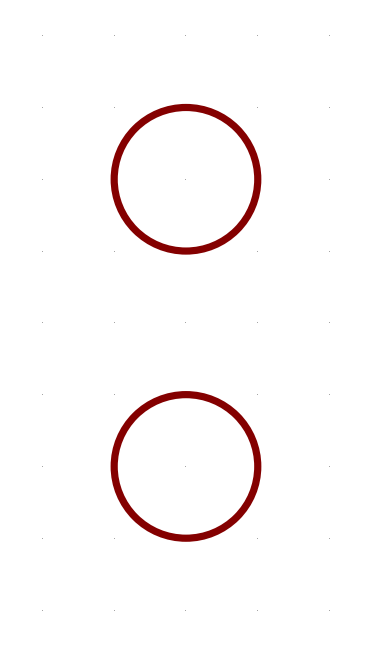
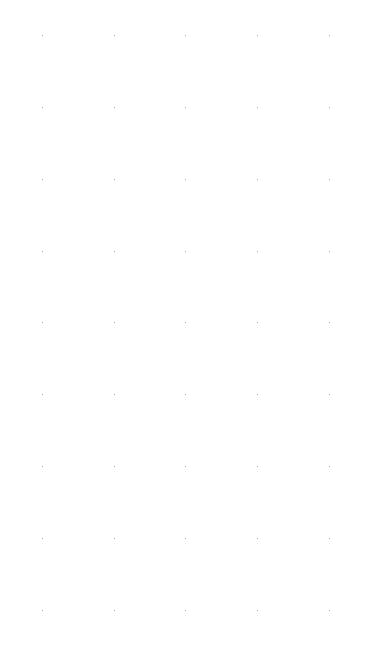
part: (185, 179) -> none
part: (185, 466) -> none

